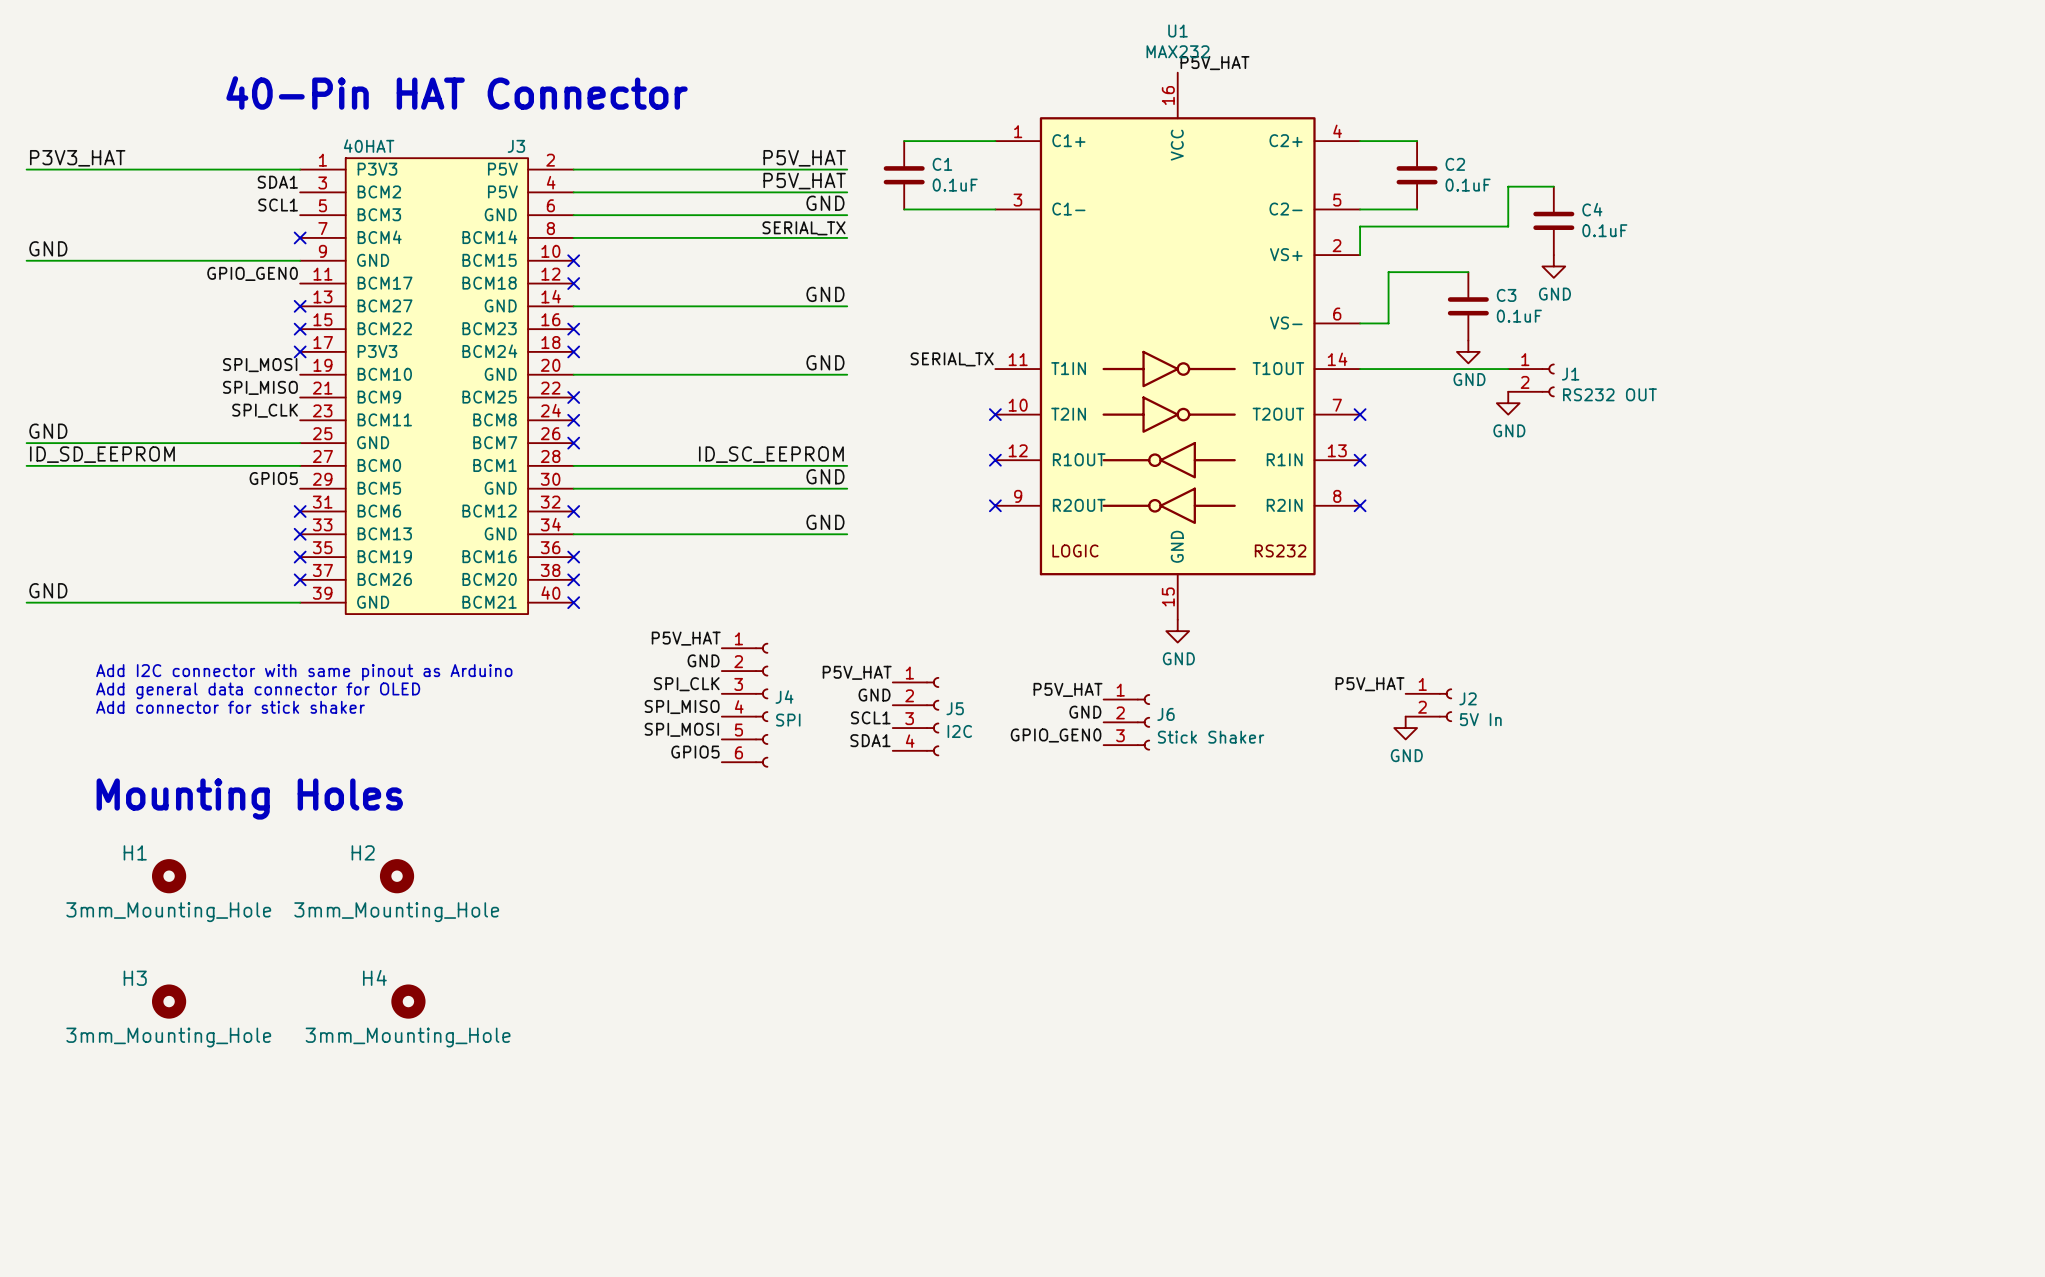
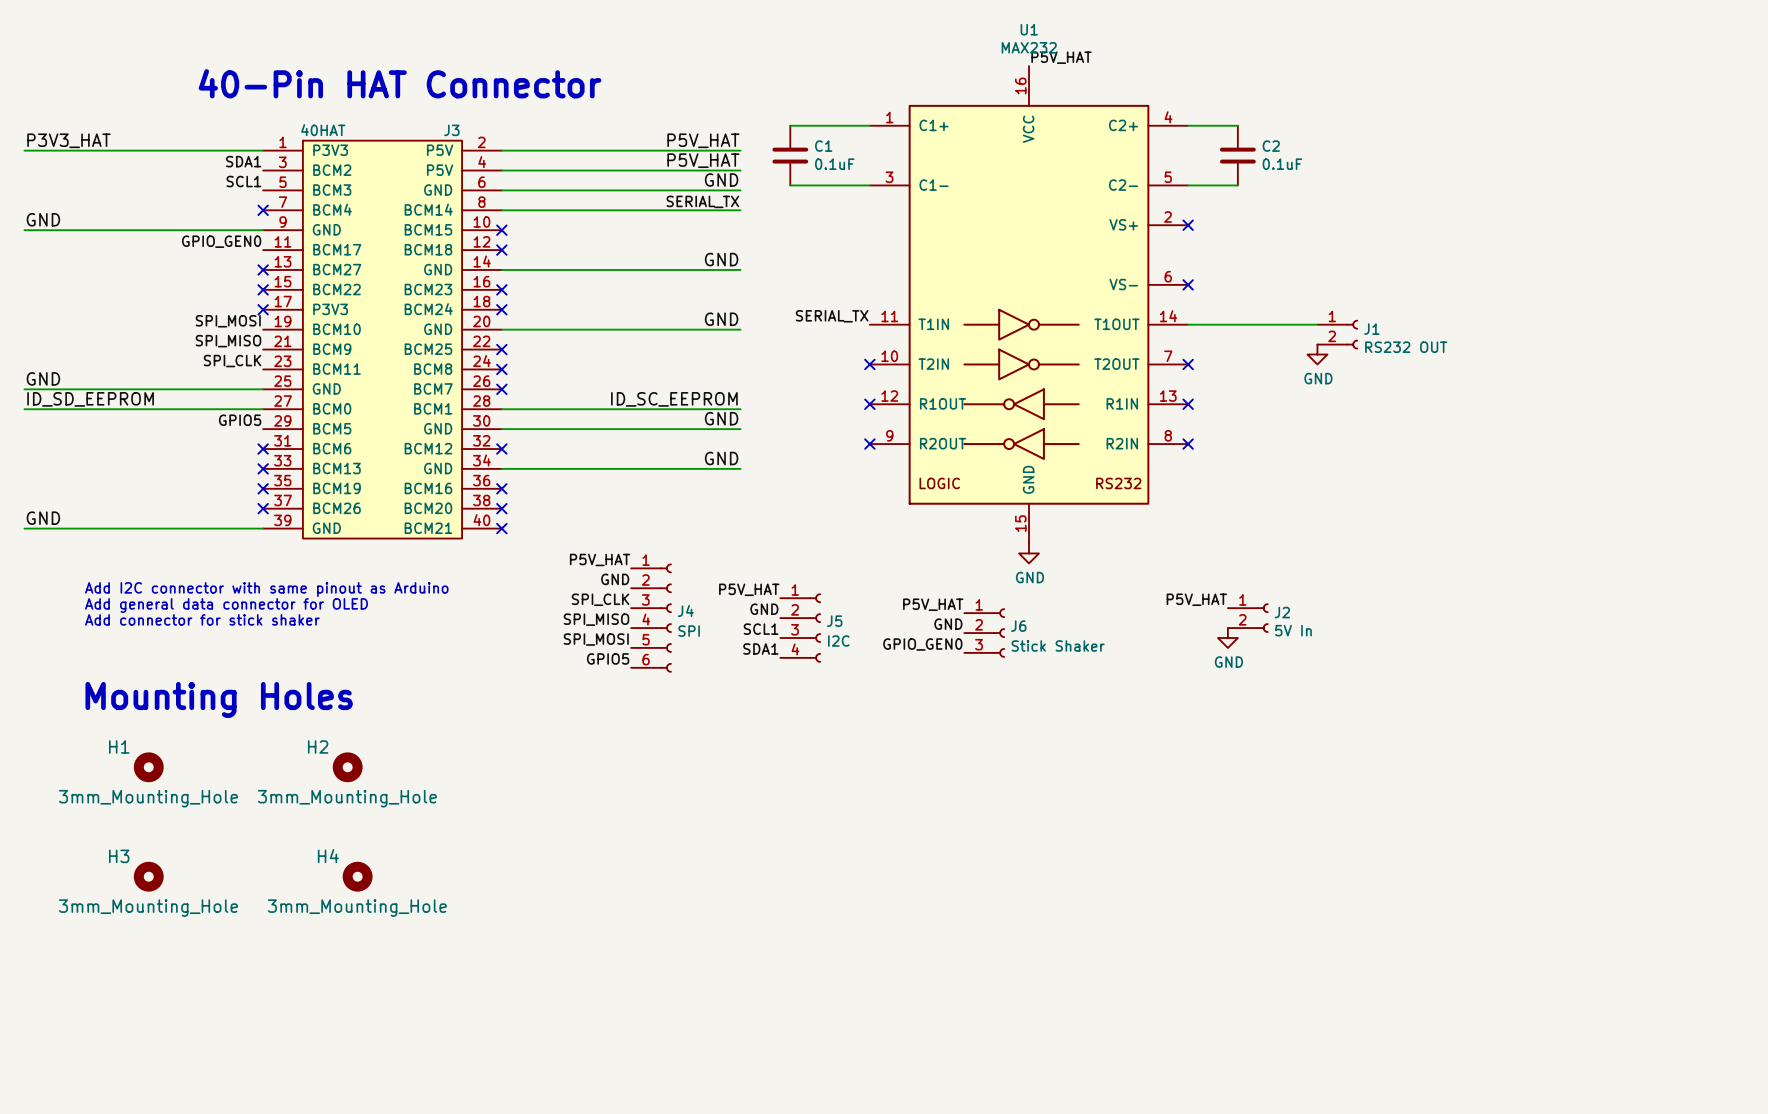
wire: (1553, 186) (1508, 186) (1508, 226) (1360, 226) (1360, 255) -> none
C4: 0.1uF (1553, 220) -> none
no-connect mark: none -> (1188, 225)
power symbol: GND (1553, 266) -> none
wire: (1468, 272) (1388, 272) (1388, 323) (1360, 323) -> none
C3: 0.1uF (1468, 306) -> none
no-connect mark: none -> (1188, 284)
power symbol: GND (1468, 351) -> none

